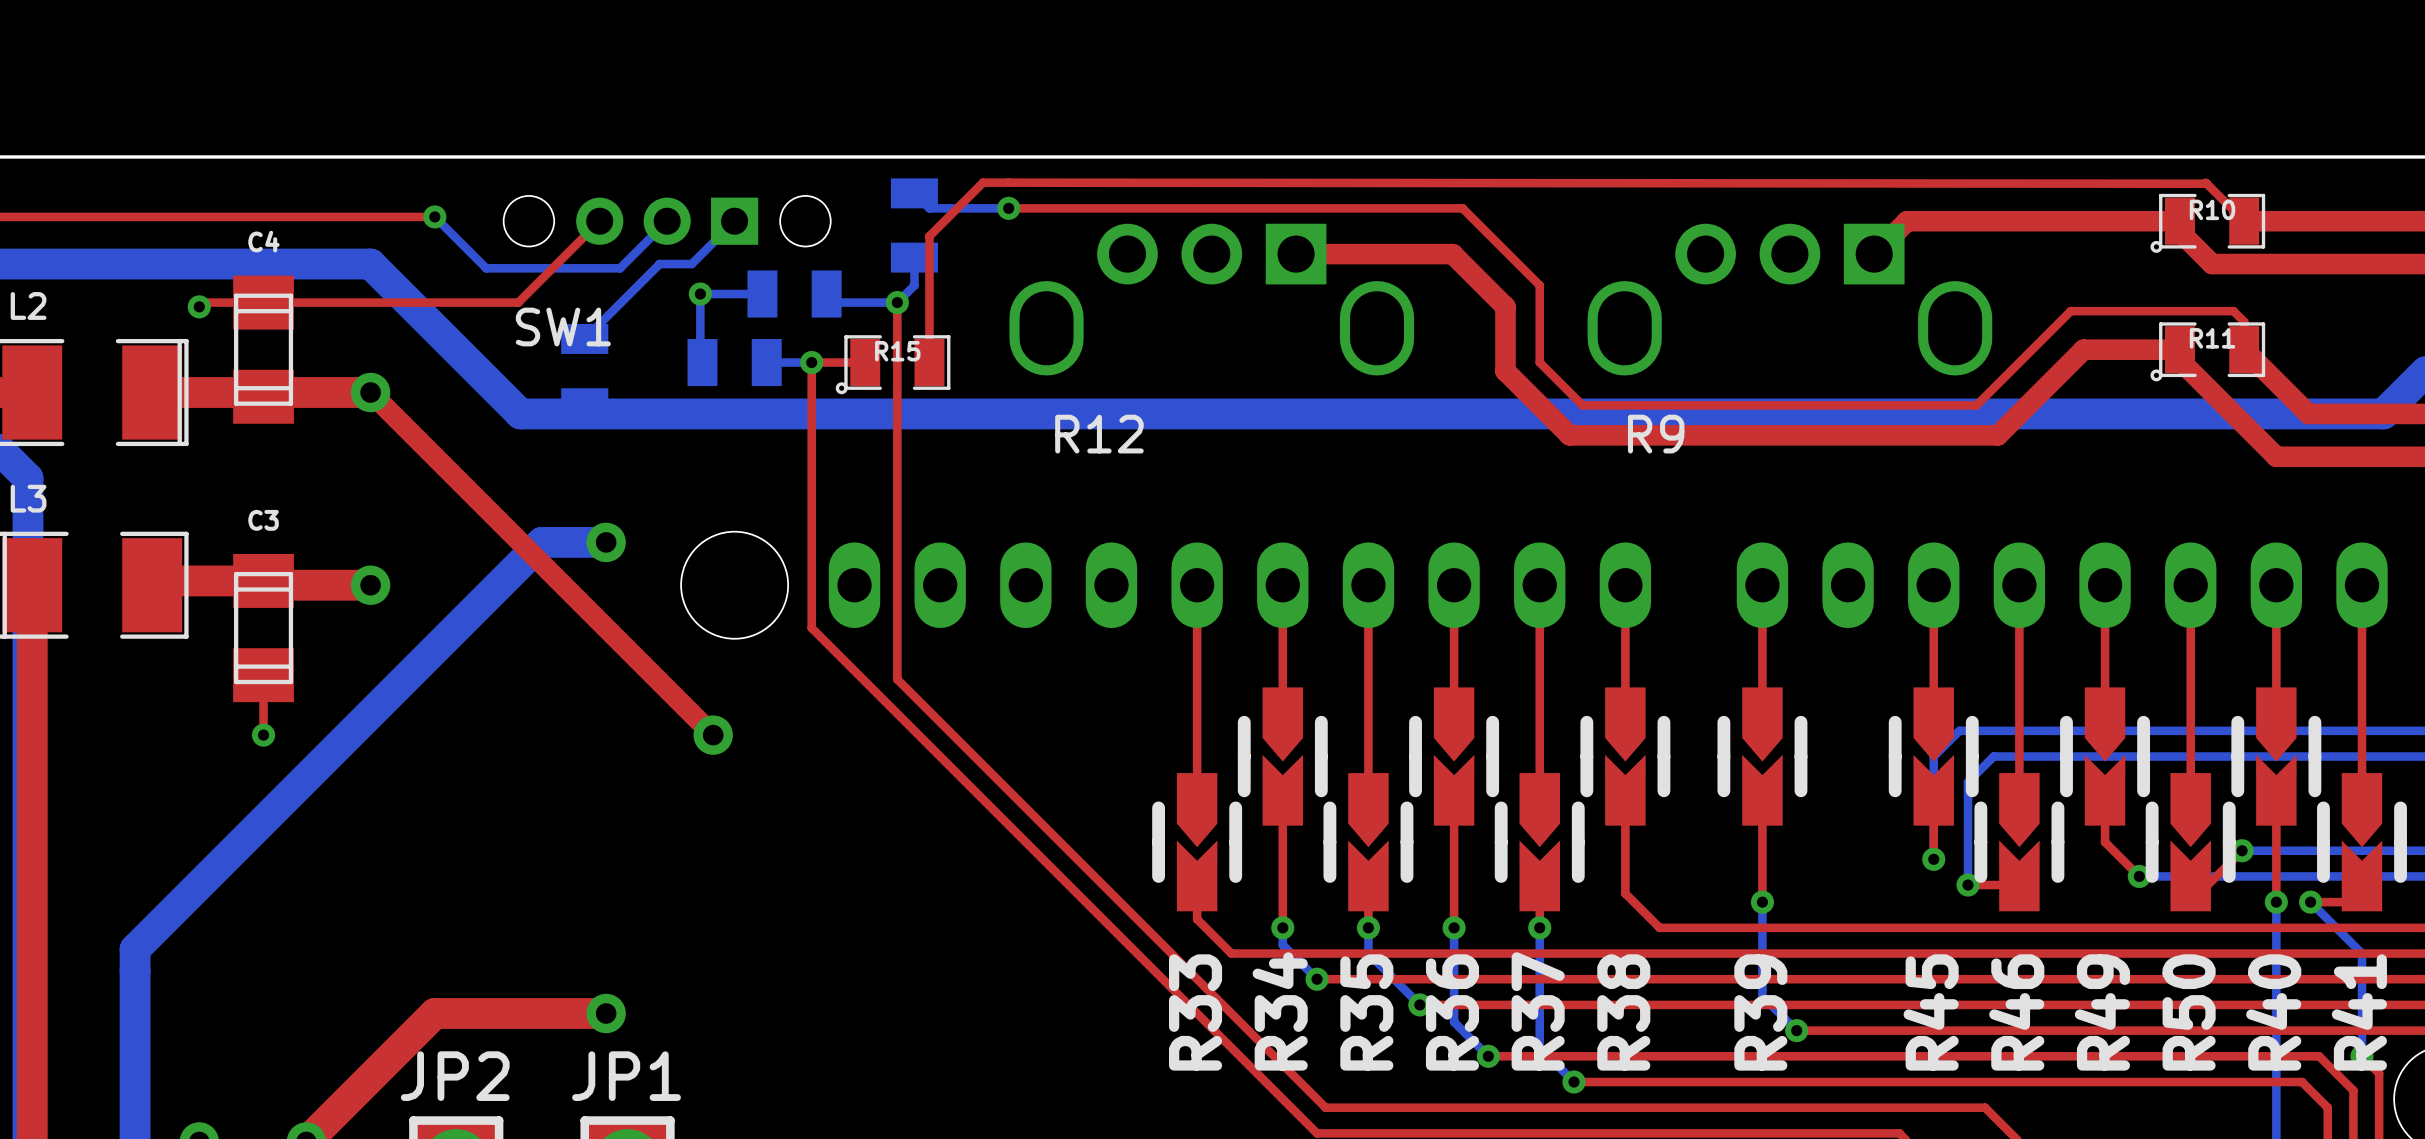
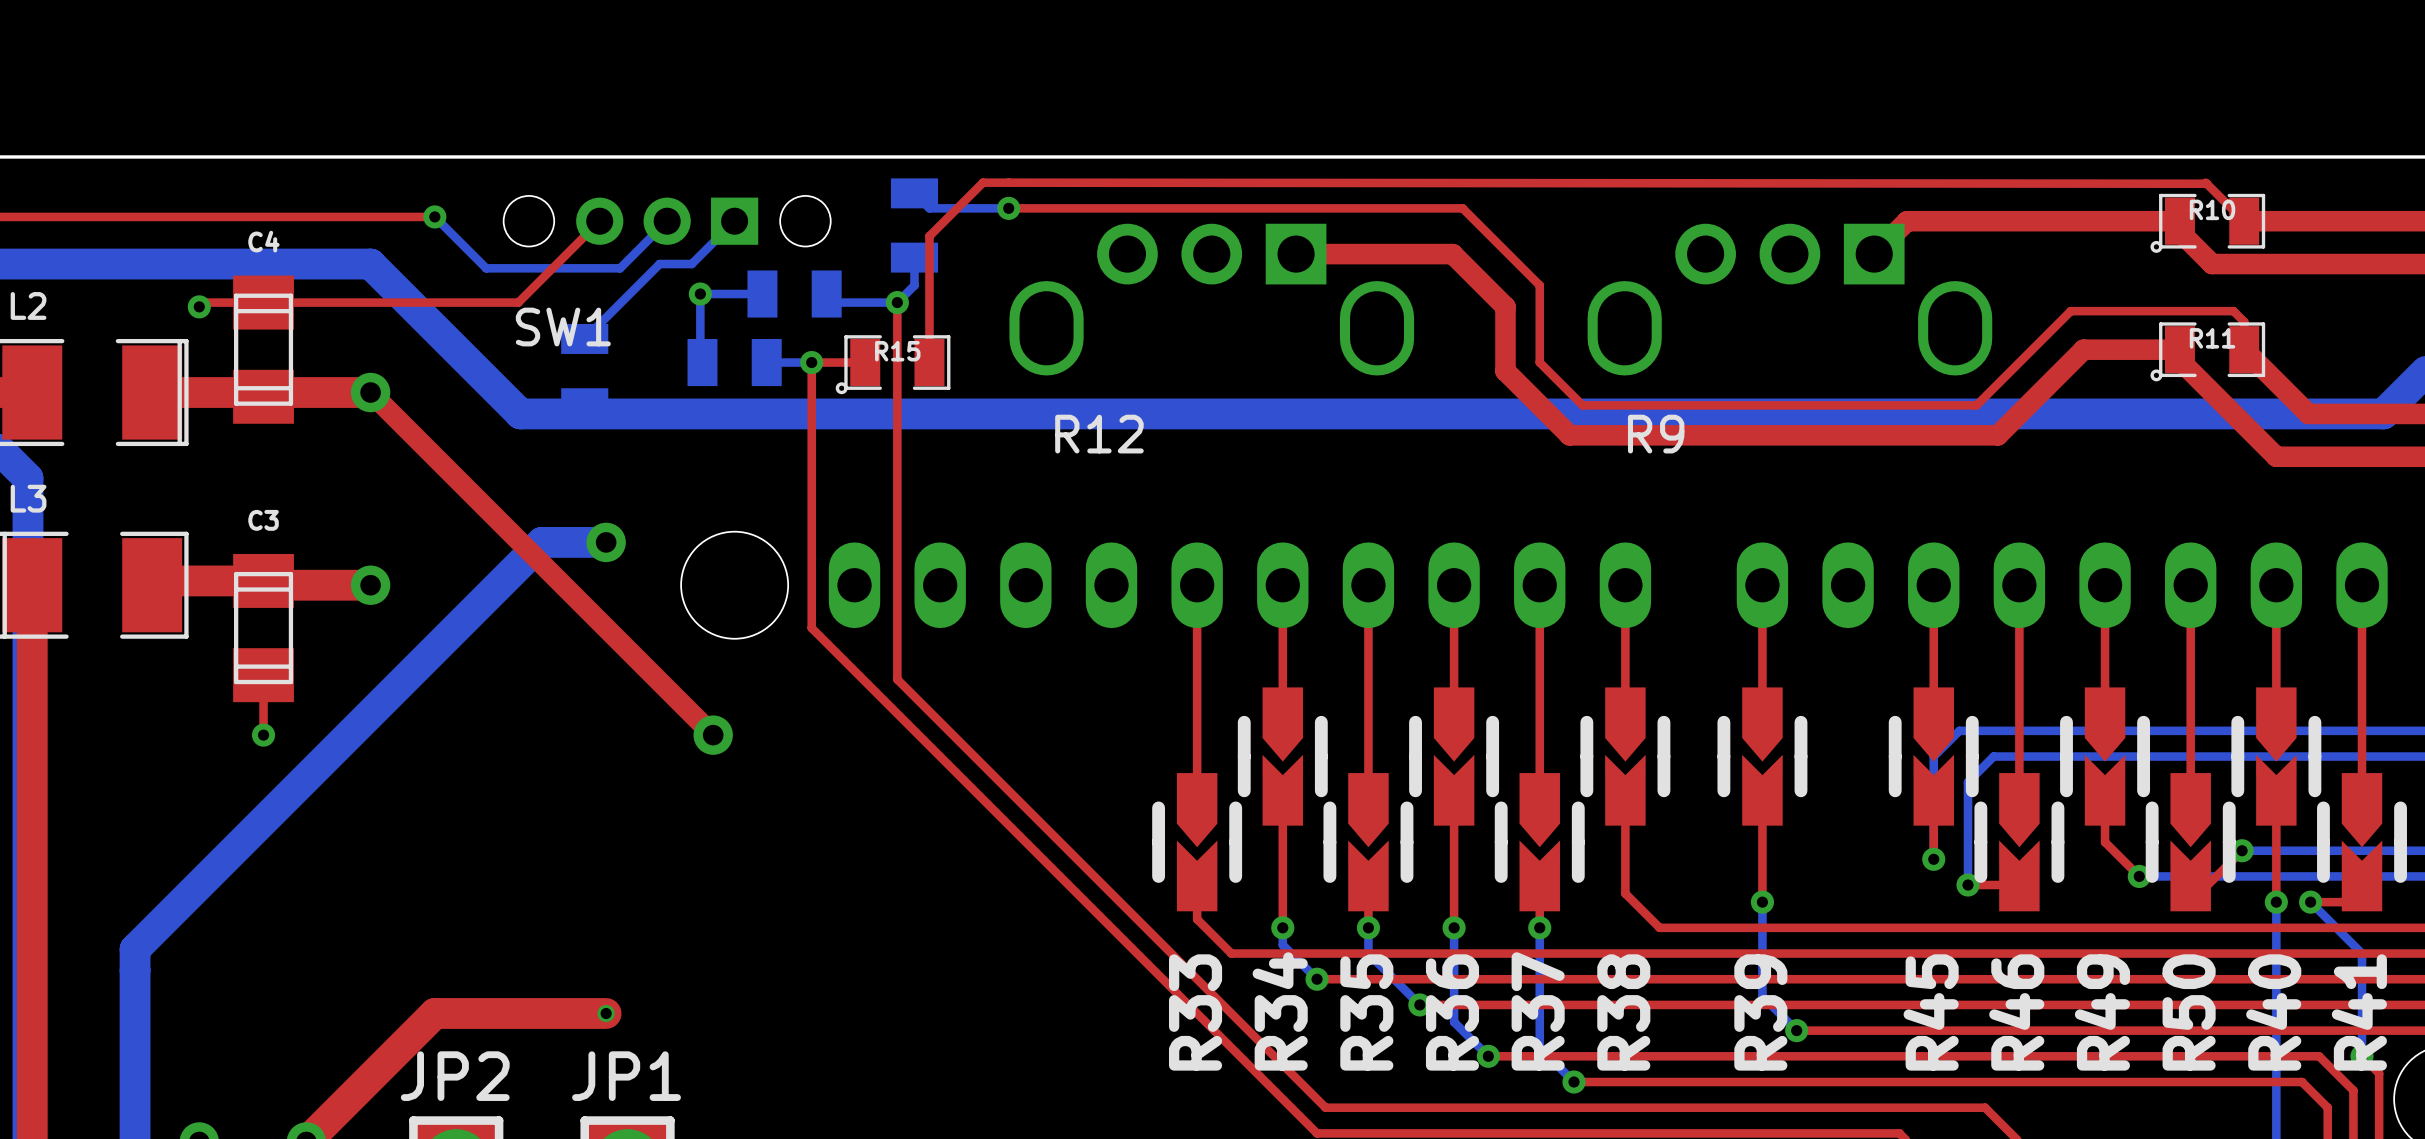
via size: [586, 993, 626, 1034] -> [597, 1004, 615, 1023]

